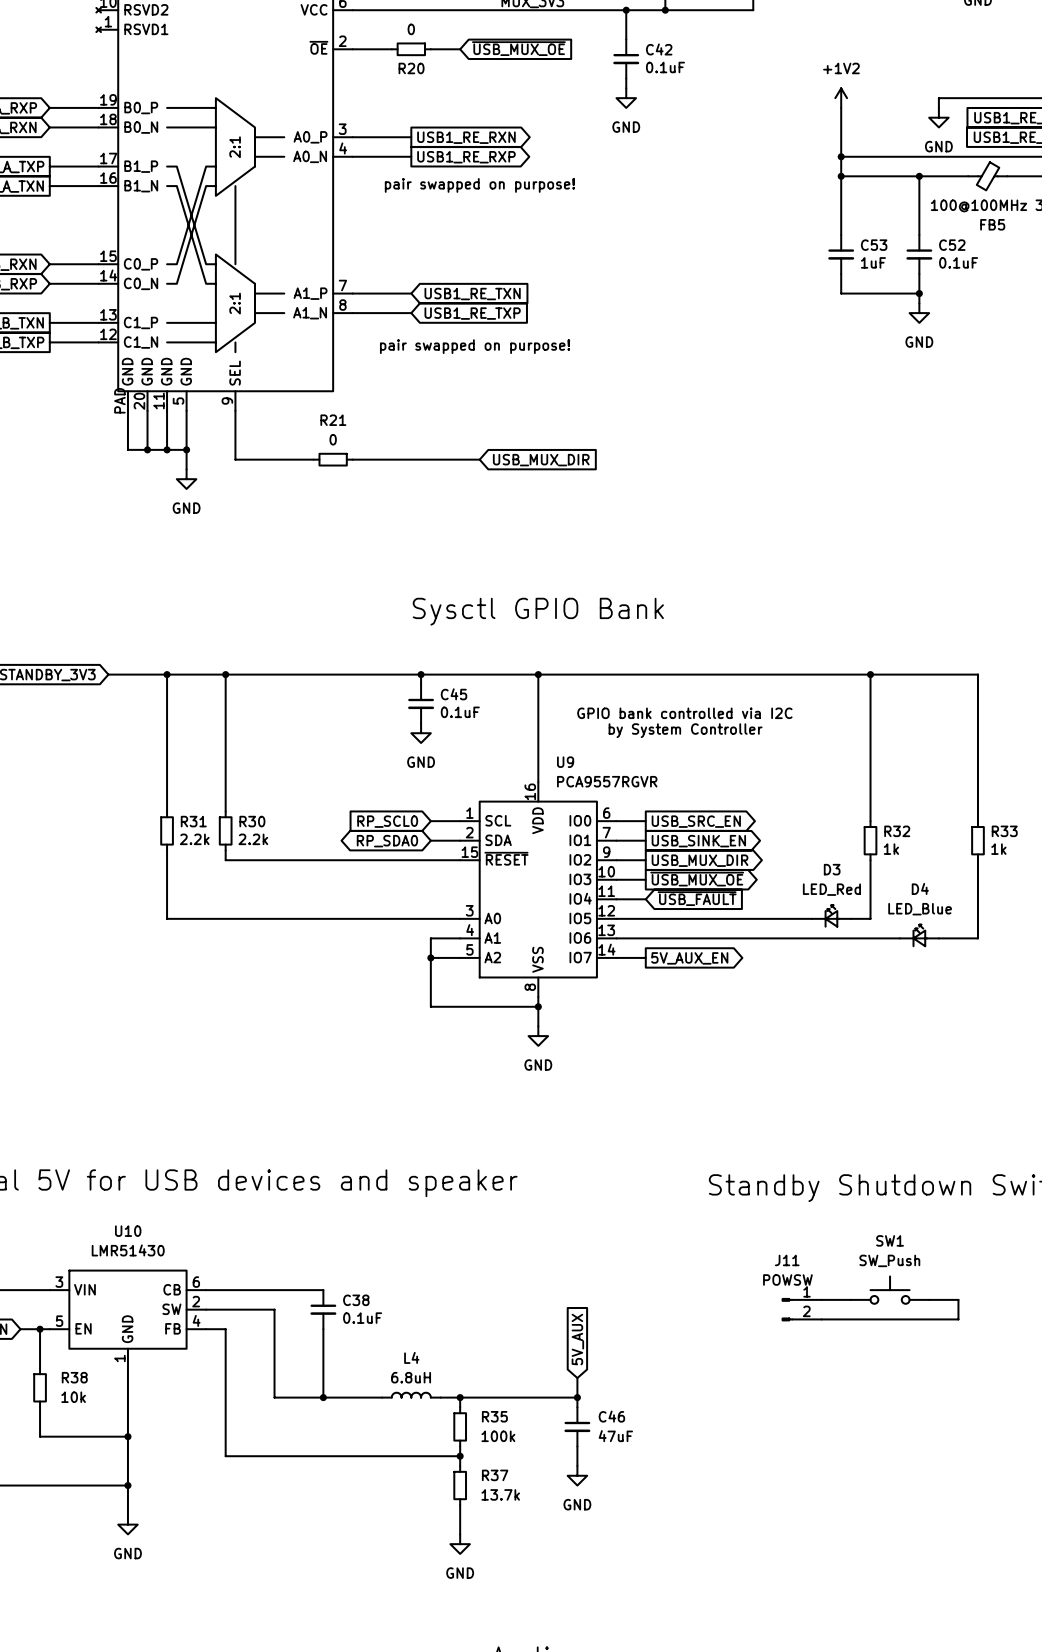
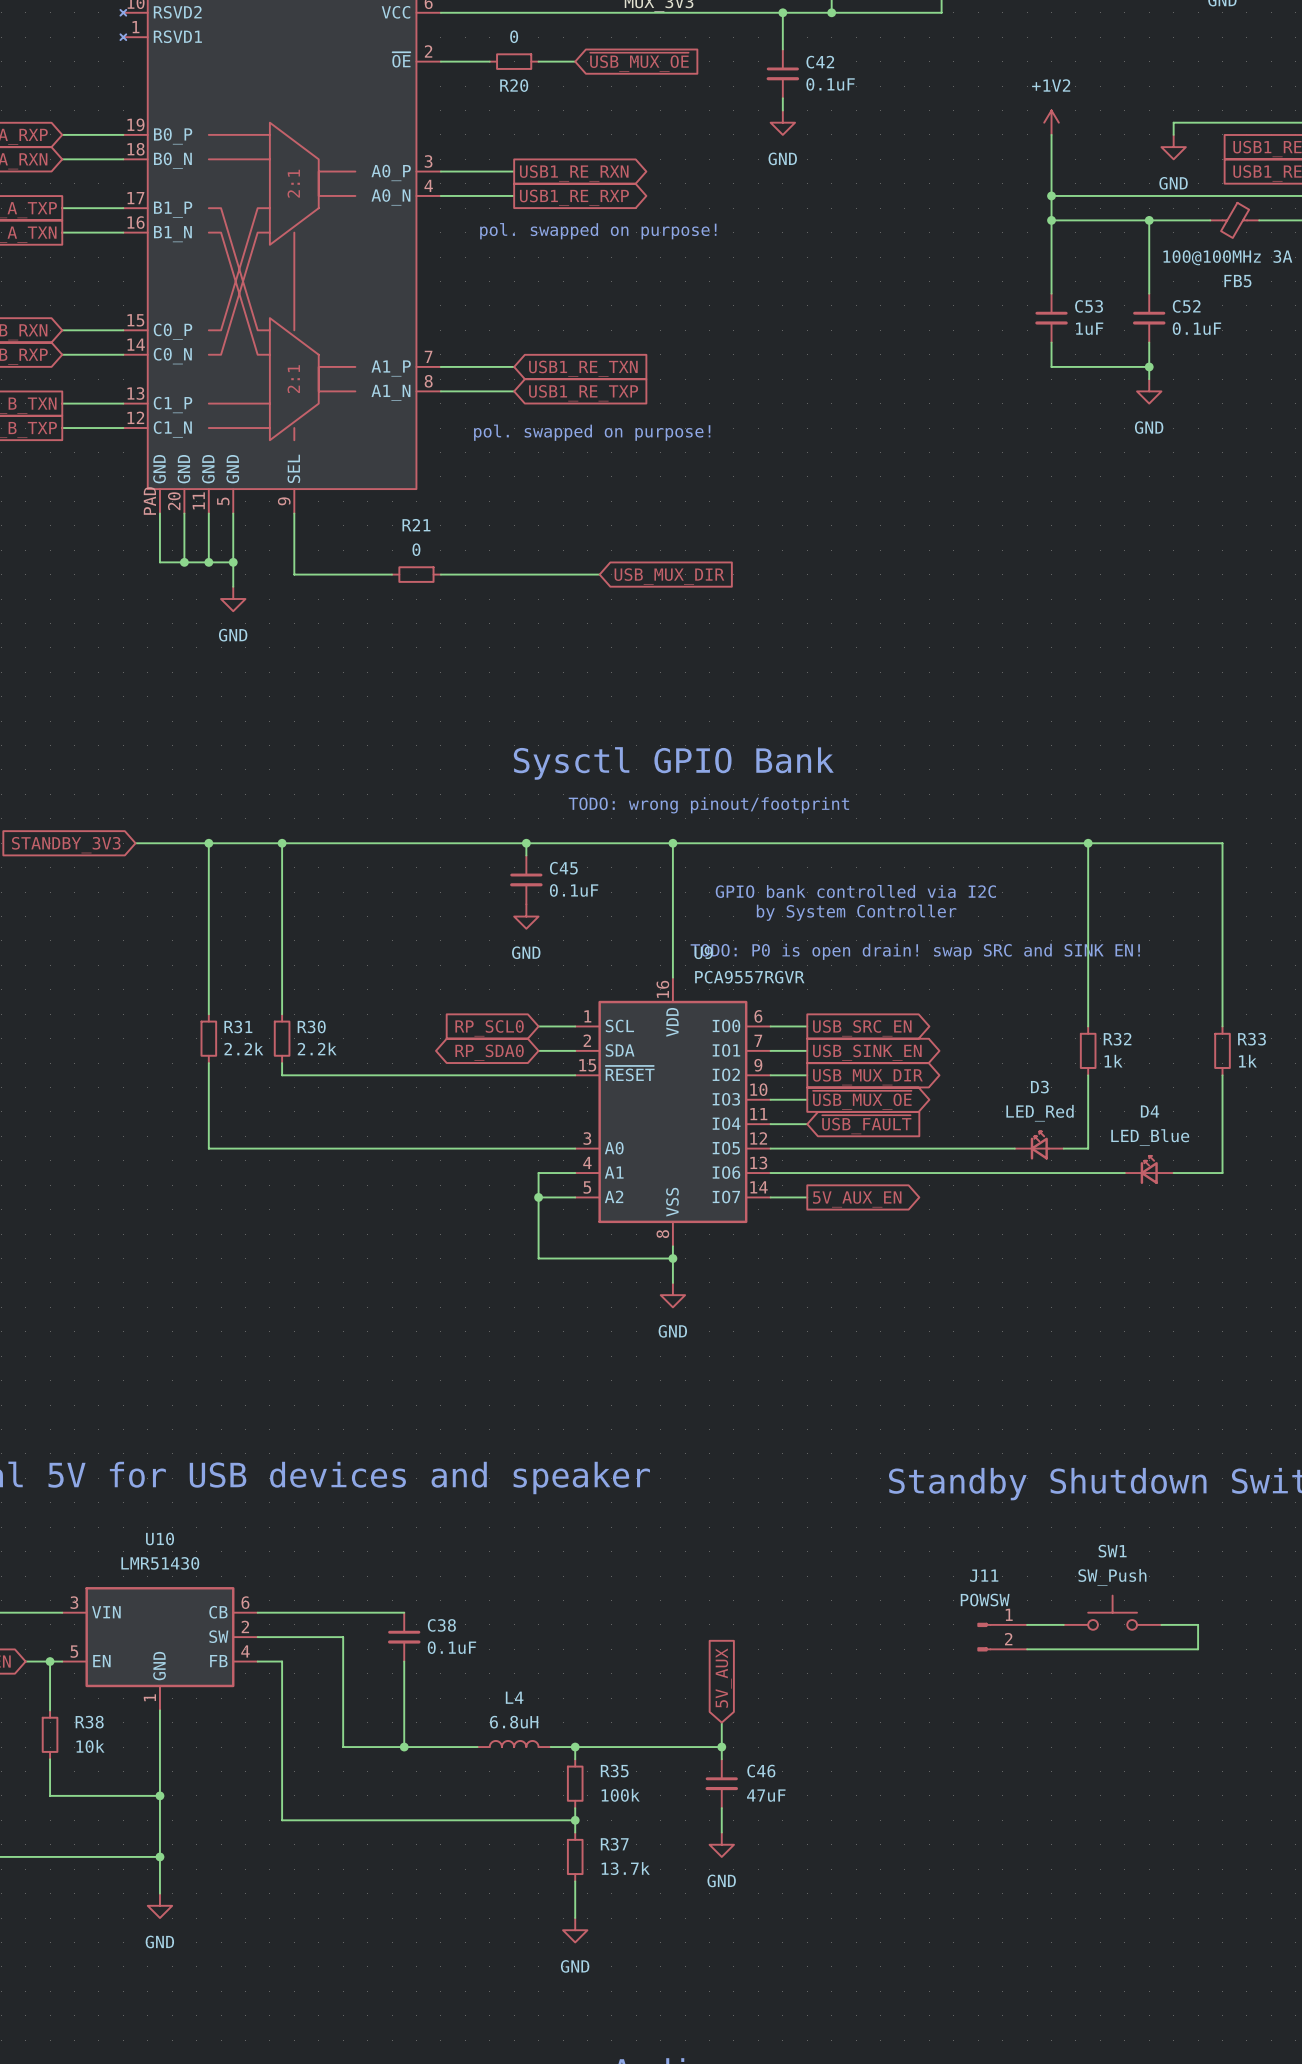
text: pair swapped on purpose! (479, 185) -> pol. swapped on purpose! (598, 231)
text: pair swapped on purpose! (475, 346) -> pol. swapped on purpose! (592, 432)
text: none -> TODO: wrong pinout/footprint (708, 805)
text: none -> TODO: P0 is open drain! swap SRC and SINK EN! (915, 951)

